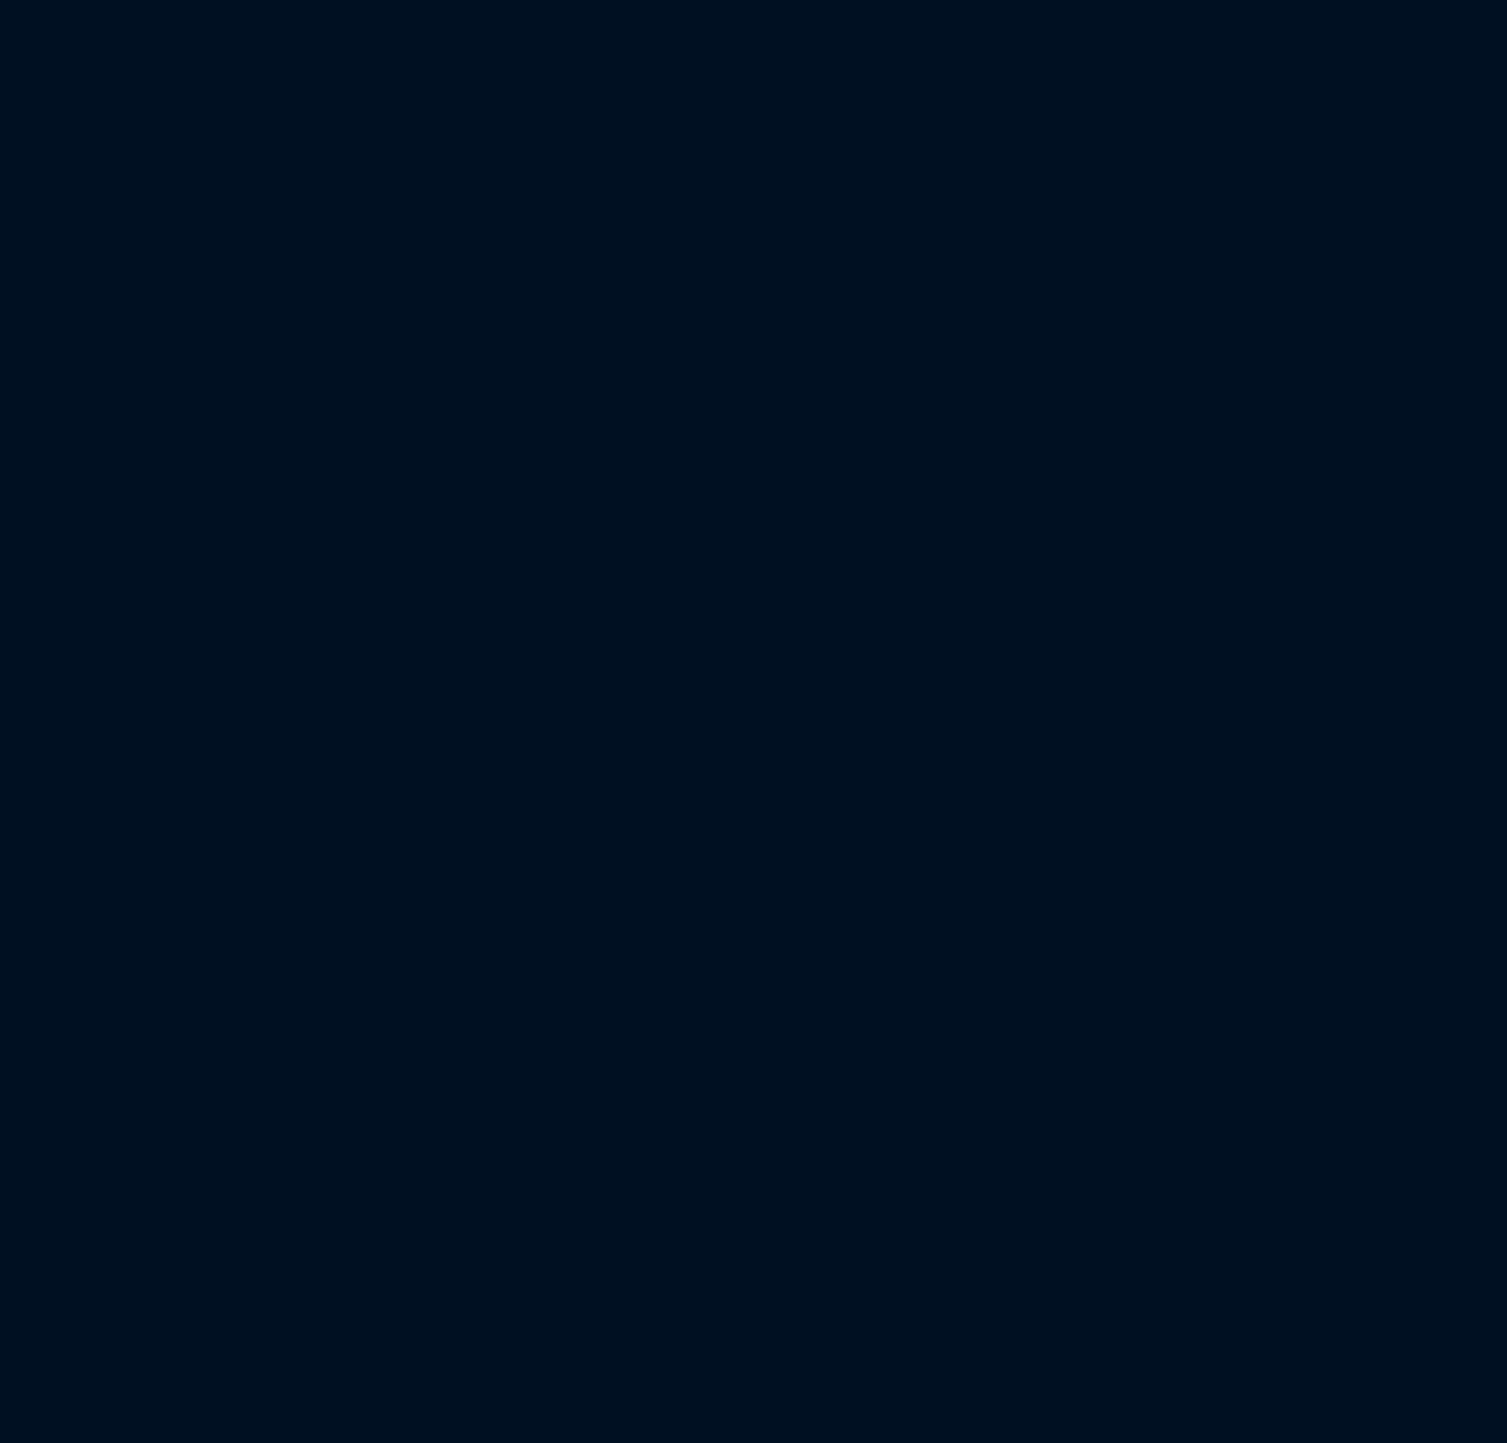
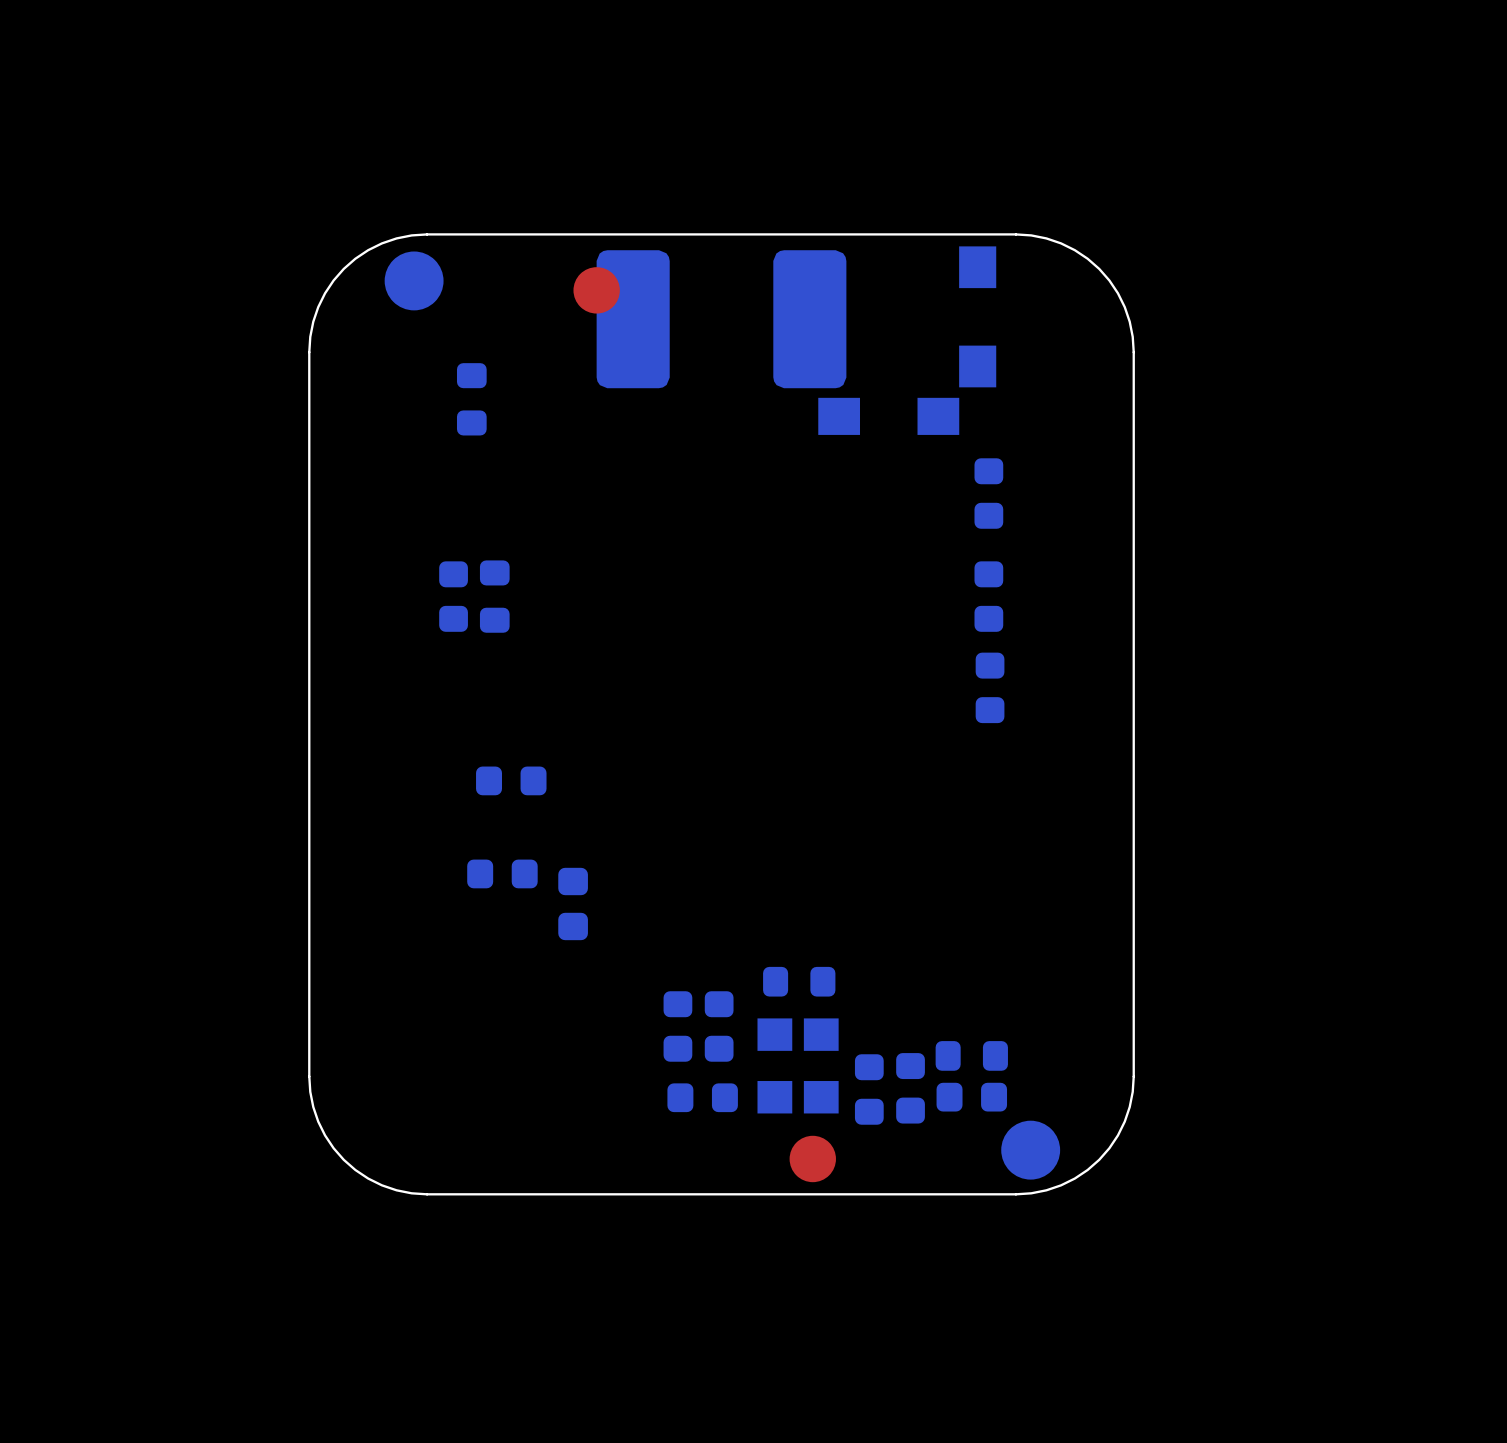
board edge: none -> (427, 234) (1031, 235) (1046, 238) (1074, 250) (1099, 268) (1109, 280) (1124, 307) (1129, 321) (1133, 352) (1133, 1076) (1129, 1107) (1117, 1135) (1099, 1159) (1087, 1169) (1061, 1185) (1046, 1190) (1015, 1194) (427, 1194) (396, 1190) (381, 1185) (355, 1169) (333, 1148) (318, 1121) (310, 1091) (309, 1076) (310, 336) (313, 321) (325, 293) (343, 268) (355, 258) (368, 250) (396, 238) (427, 234)
part: none -> (414, 280)
part: none -> (596, 290)
part: none -> (977, 316)
part: none -> (633, 319)
part: none -> (809, 319)
part: none -> (471, 399)
part: none -> (888, 416)
part: none -> (988, 493)
part: none -> (453, 596)
part: none -> (494, 596)
part: none -> (988, 596)
part: none -> (990, 687)
part: none -> (511, 780)
part: none -> (502, 873)
part: none -> (573, 903)
part: none -> (799, 981)
part: none -> (677, 1026)
part: none -> (719, 1026)
part: none -> (971, 1055)
part: none -> (798, 1065)
part: none -> (910, 1088)
part: none -> (869, 1089)
part: none -> (702, 1097)
part: none -> (971, 1097)
part: none -> (1030, 1150)
part: none -> (812, 1158)

